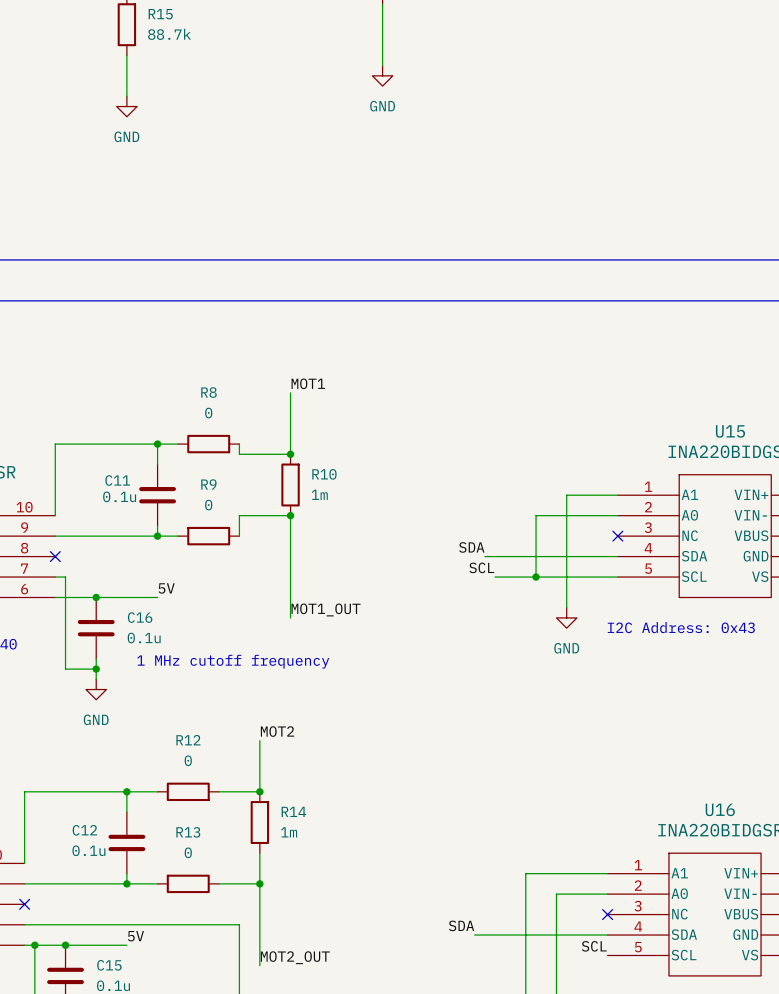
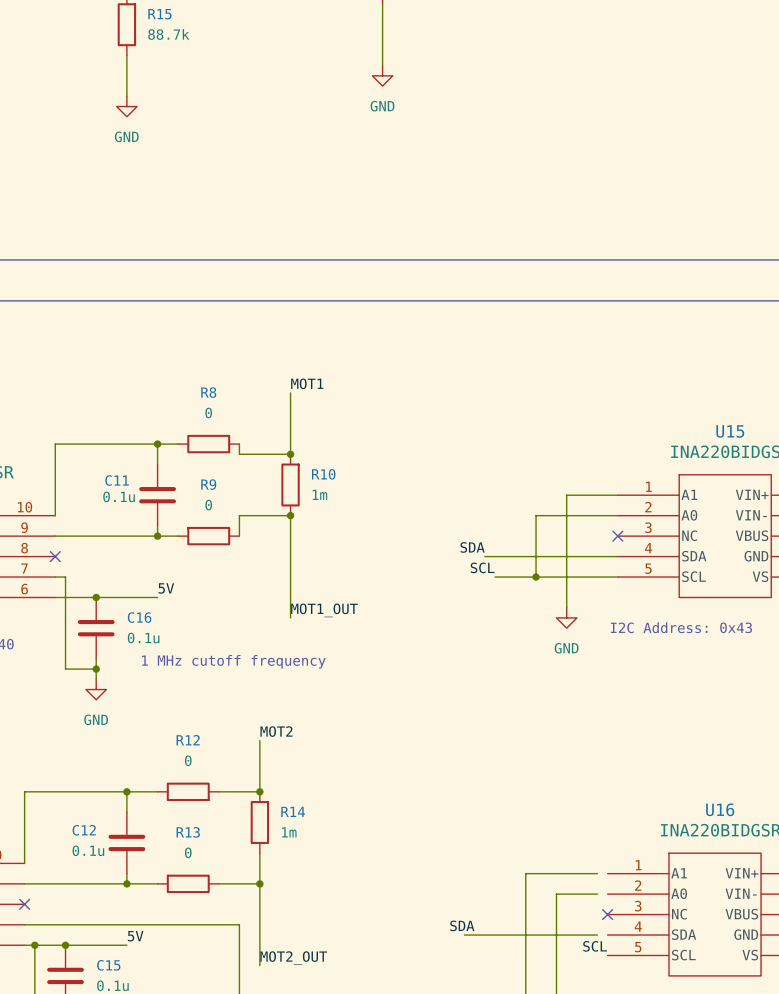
wire: (597, 873) (607, 873) -> none
wire: (597, 894) (607, 894) -> none
wire: (597, 935) (607, 935) -> (464, 935) (474, 935)

